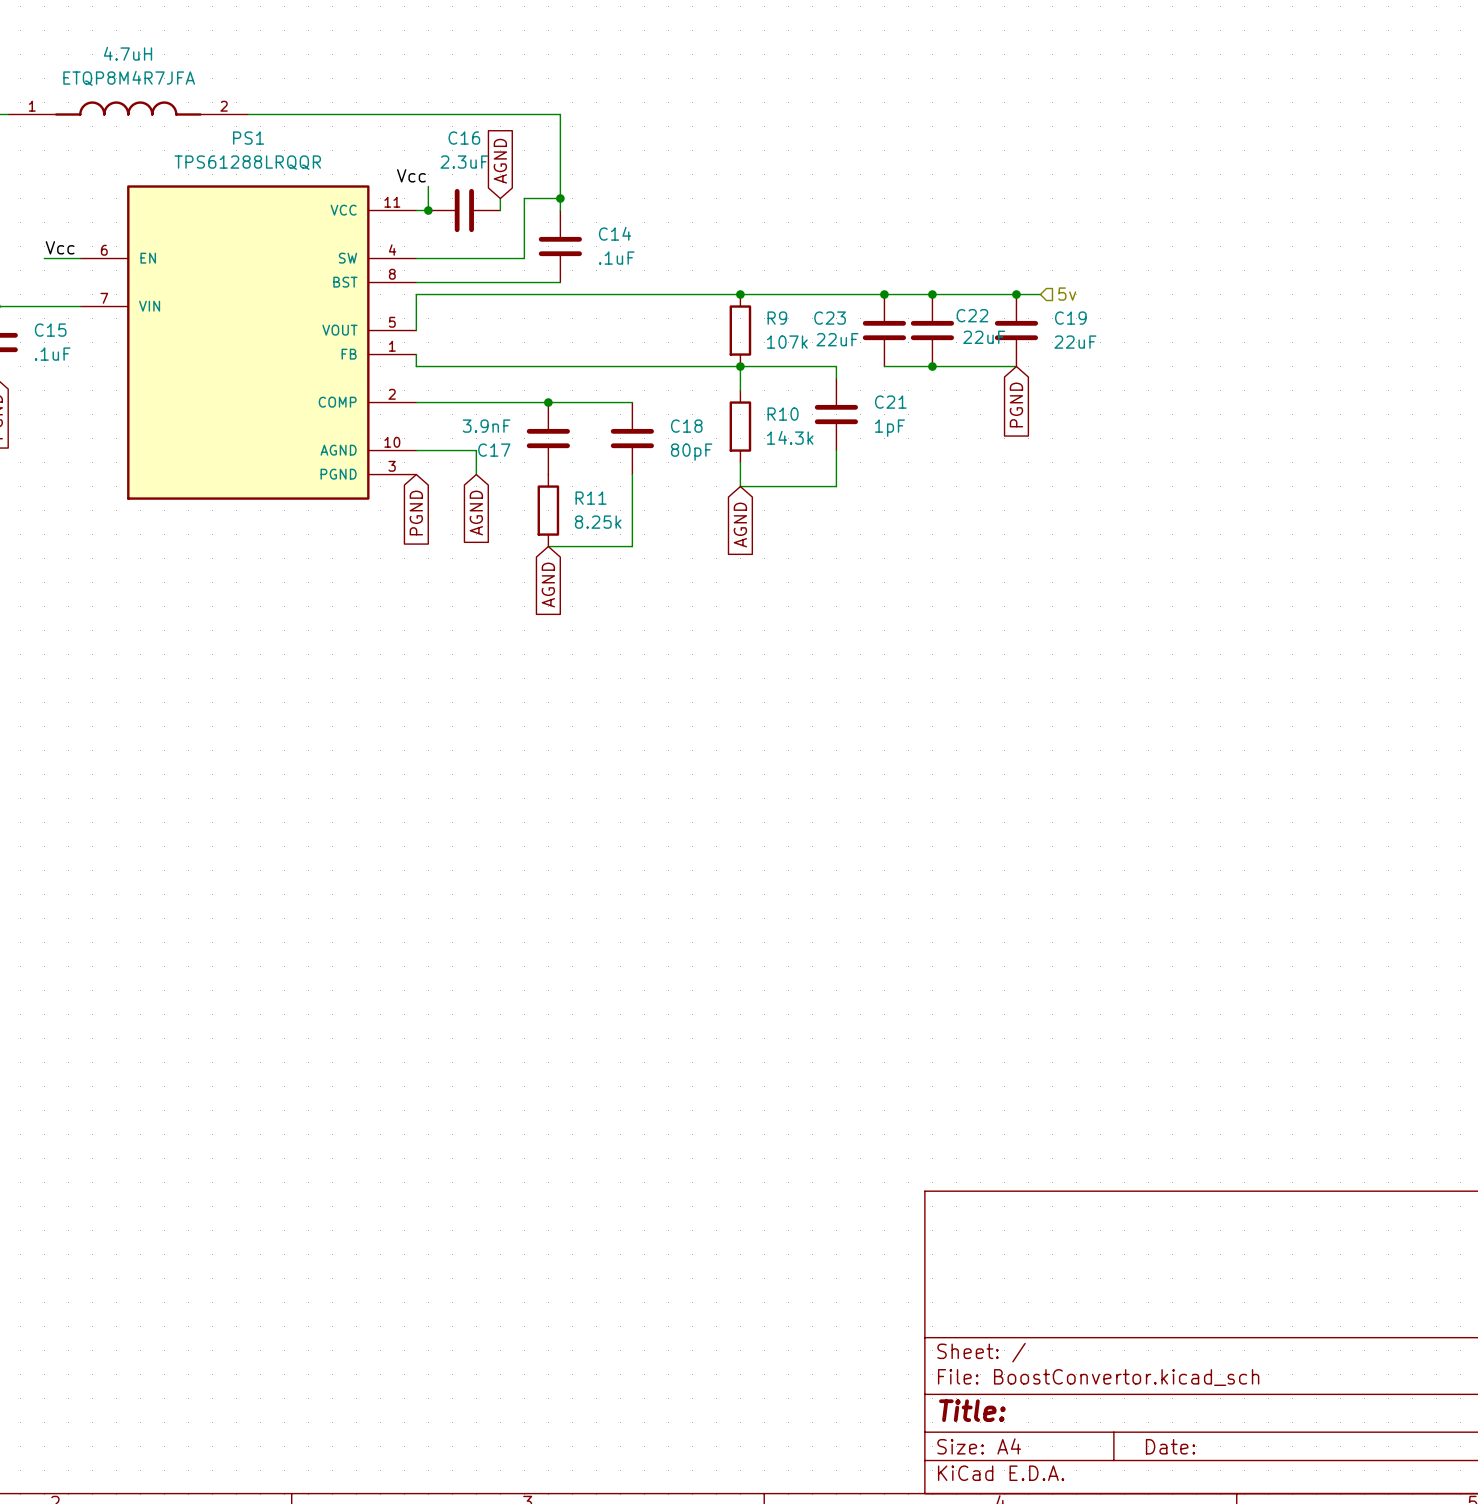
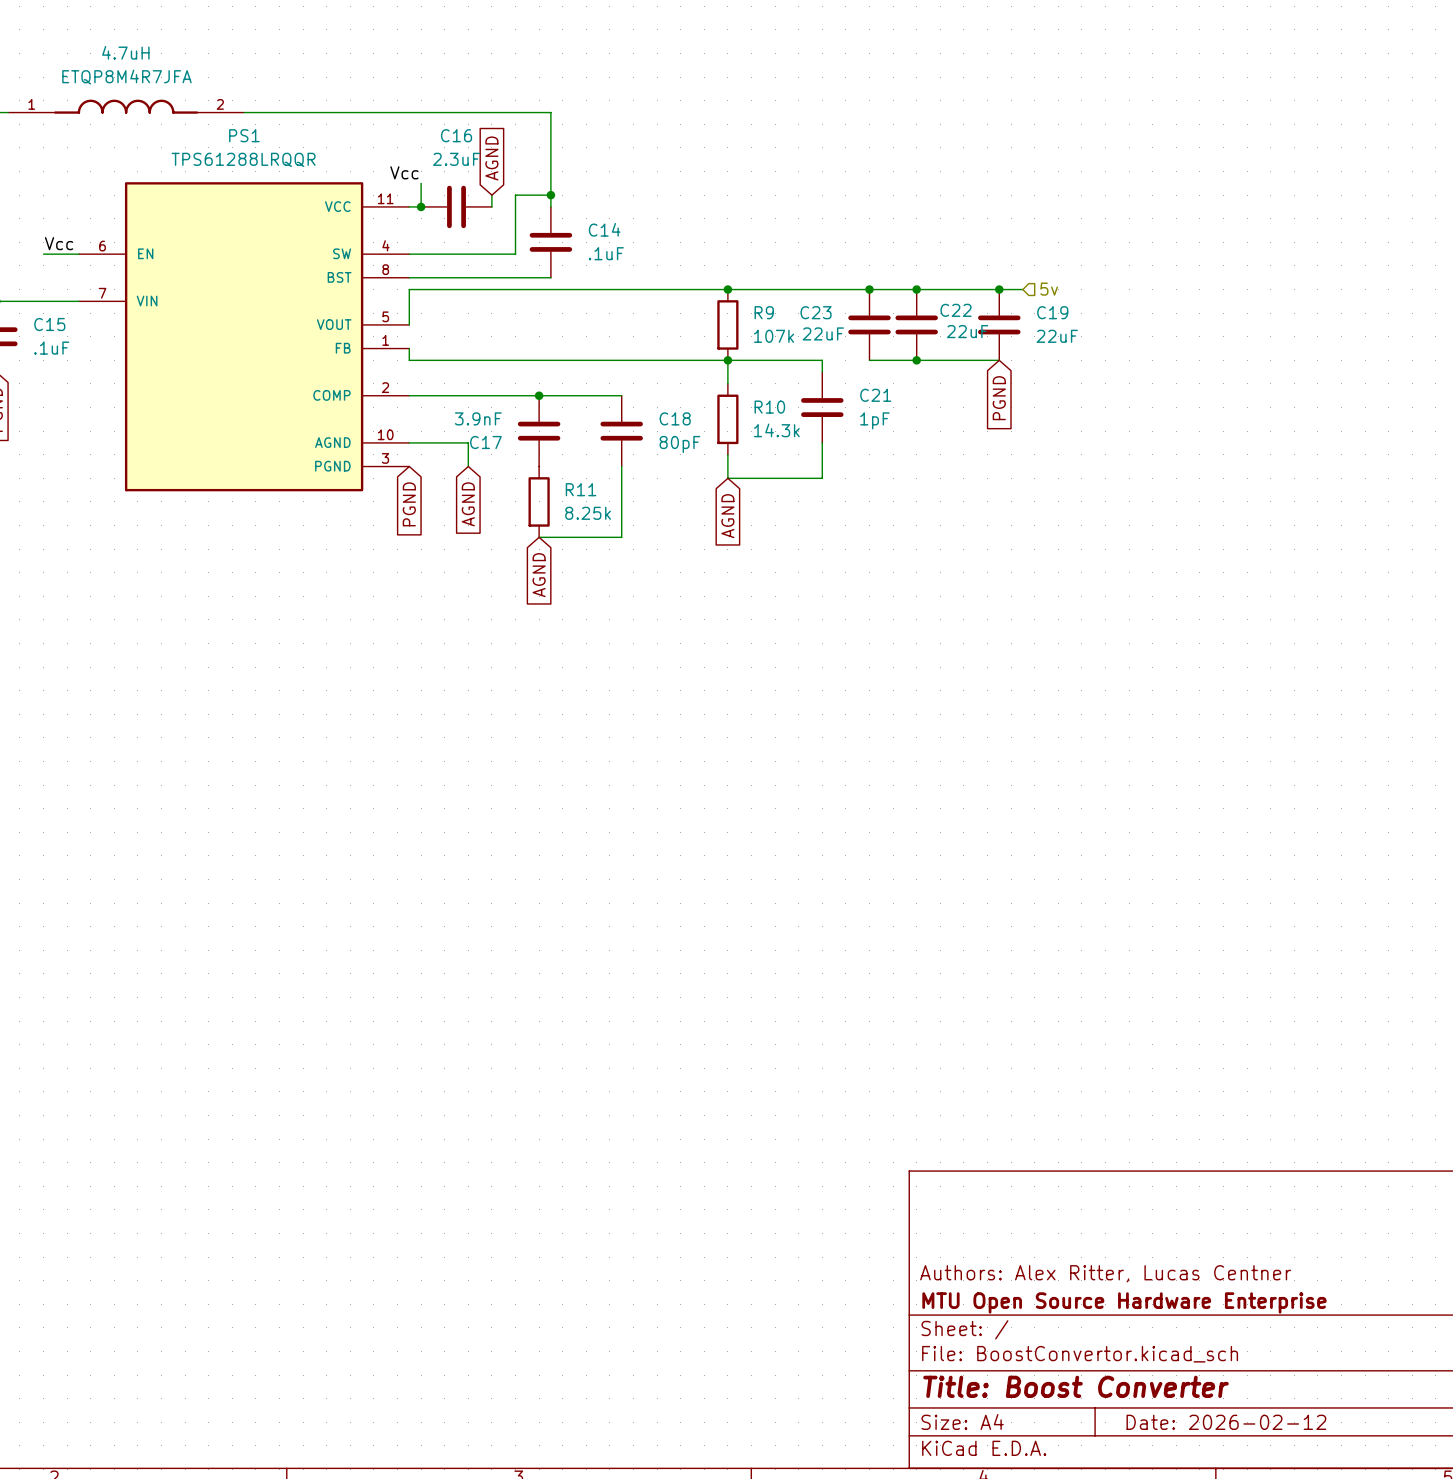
title block: none -> Authors: Alex Ritter, Lucas Centner (1105, 1273)
title block: none -> MTU Open Source Hardware Enterprise (1124, 1302)
title block: Title: (972, 1410) -> Title: Boost Converter (1076, 1386)
title block: Date: (1170, 1446) -> Date: 2026-02-12 (1226, 1422)

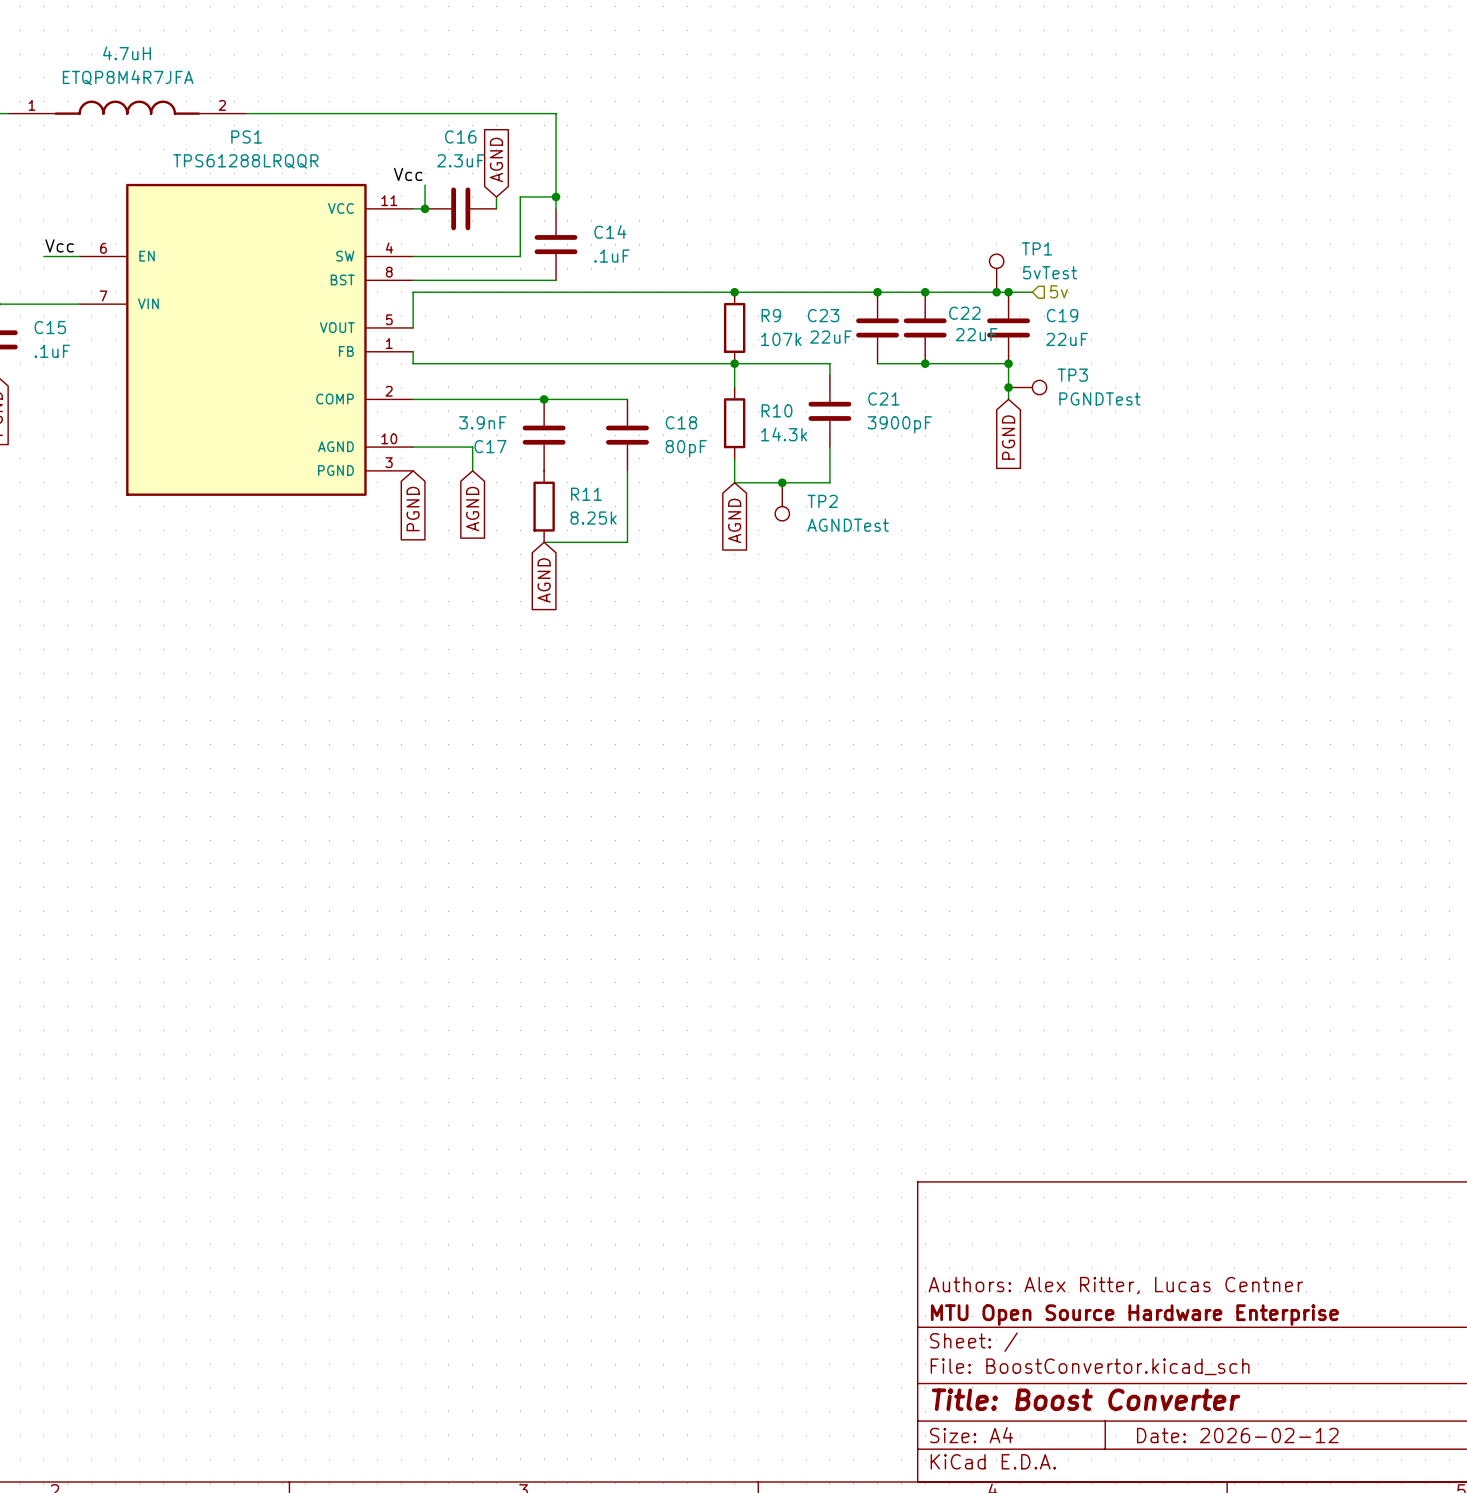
TP1: none -> 5vTest (996, 273)
junction: none -> (996, 292)
wire: none -> (1008, 363) (1008, 399)
junction: none -> (1008, 363)
junction: none -> (1008, 387)
TP3: none -> PGNDTest (1027, 387)
global label position: PGND (999, 398) -> PGND (1008, 437)
C21 value: 1pF (874, 420) -> 3900pF (899, 424)
junction: none -> (782, 482)
TP2: none -> AGNDTest (782, 501)

